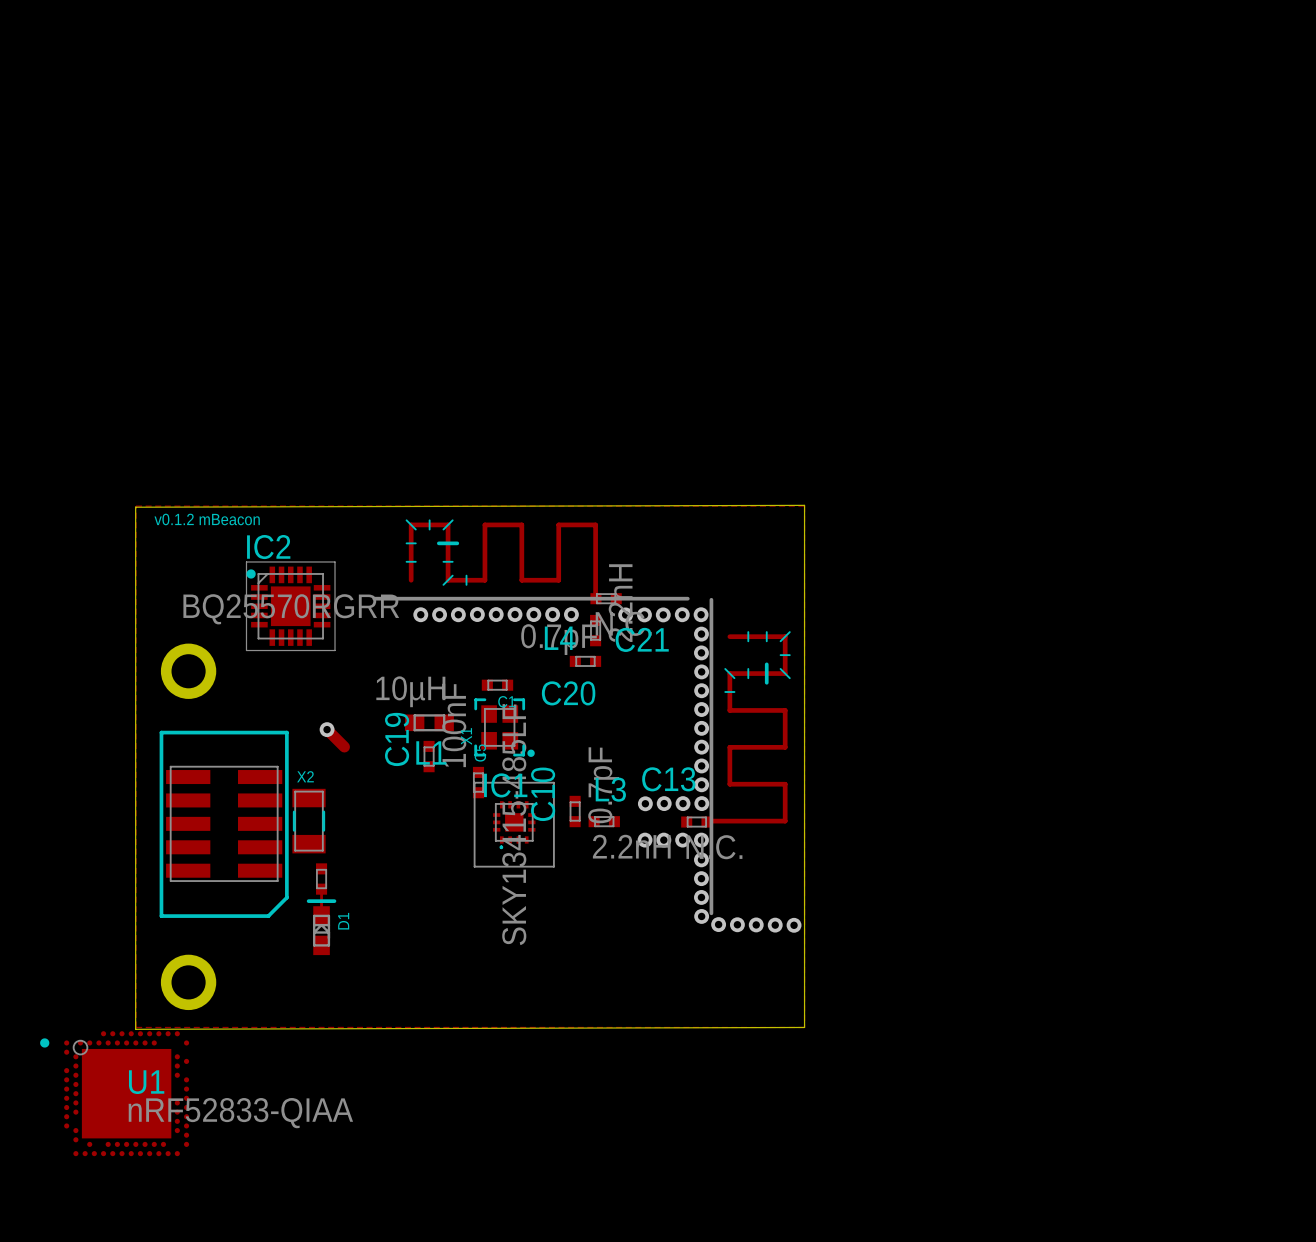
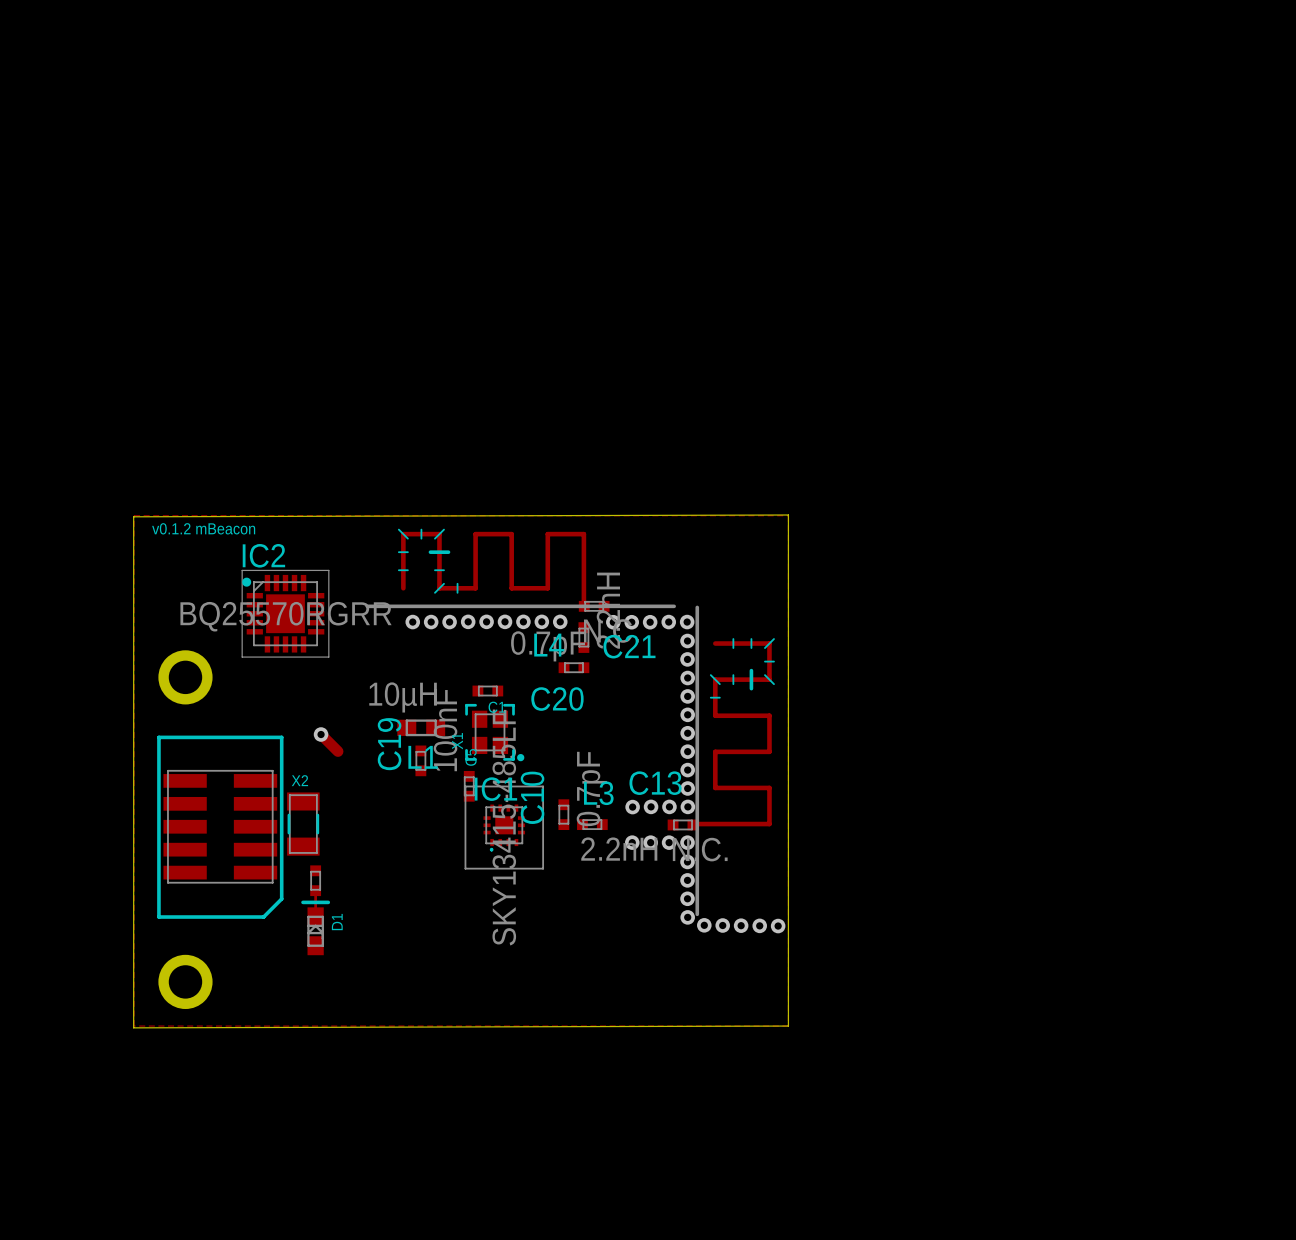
U1: nRF52833-QIAA (114, 1093) -> none

